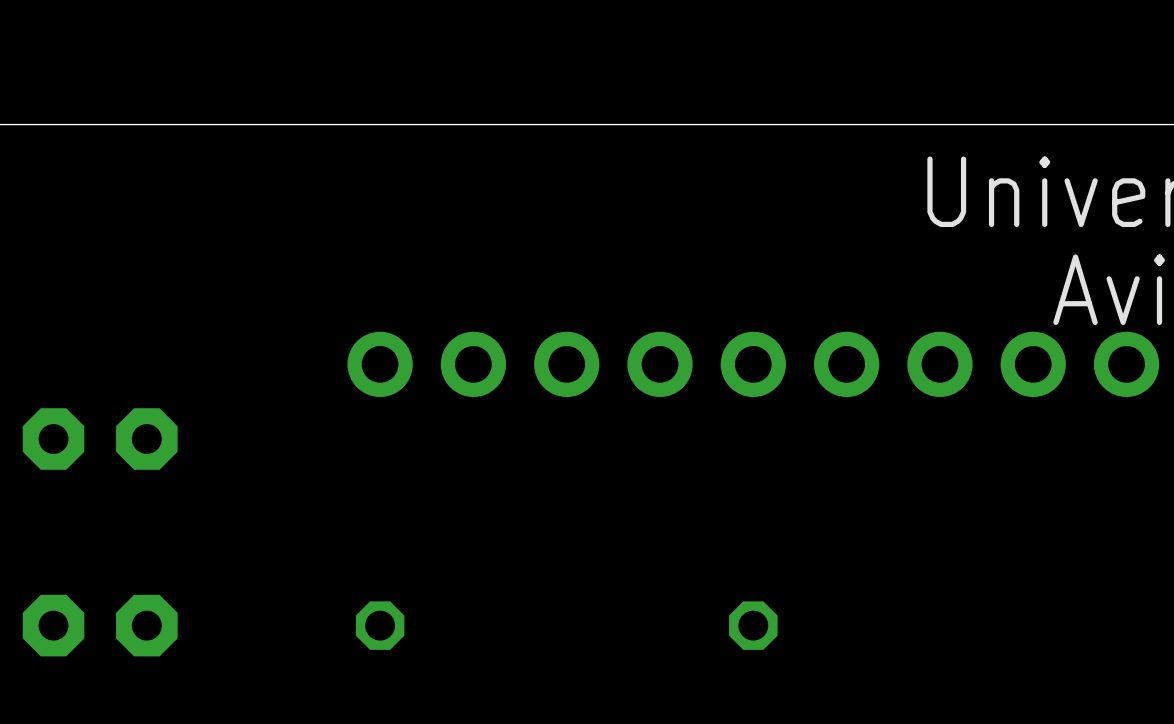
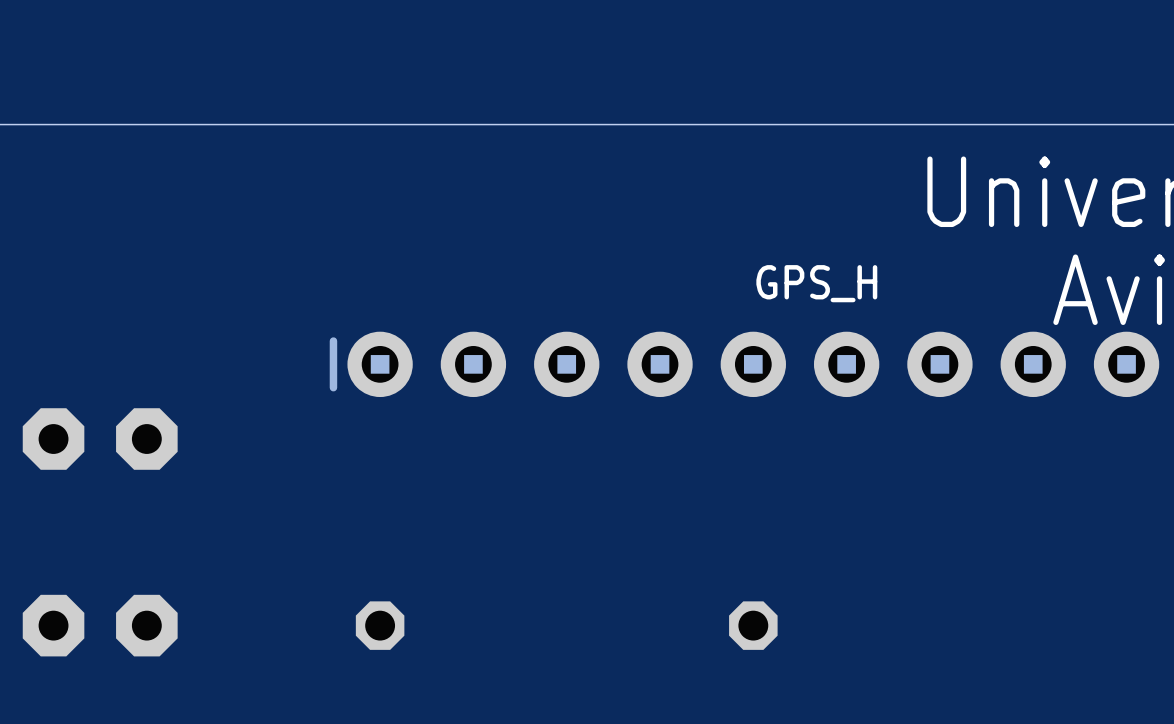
GPS_H side: top (753, 364) -> bottom (744, 364)

